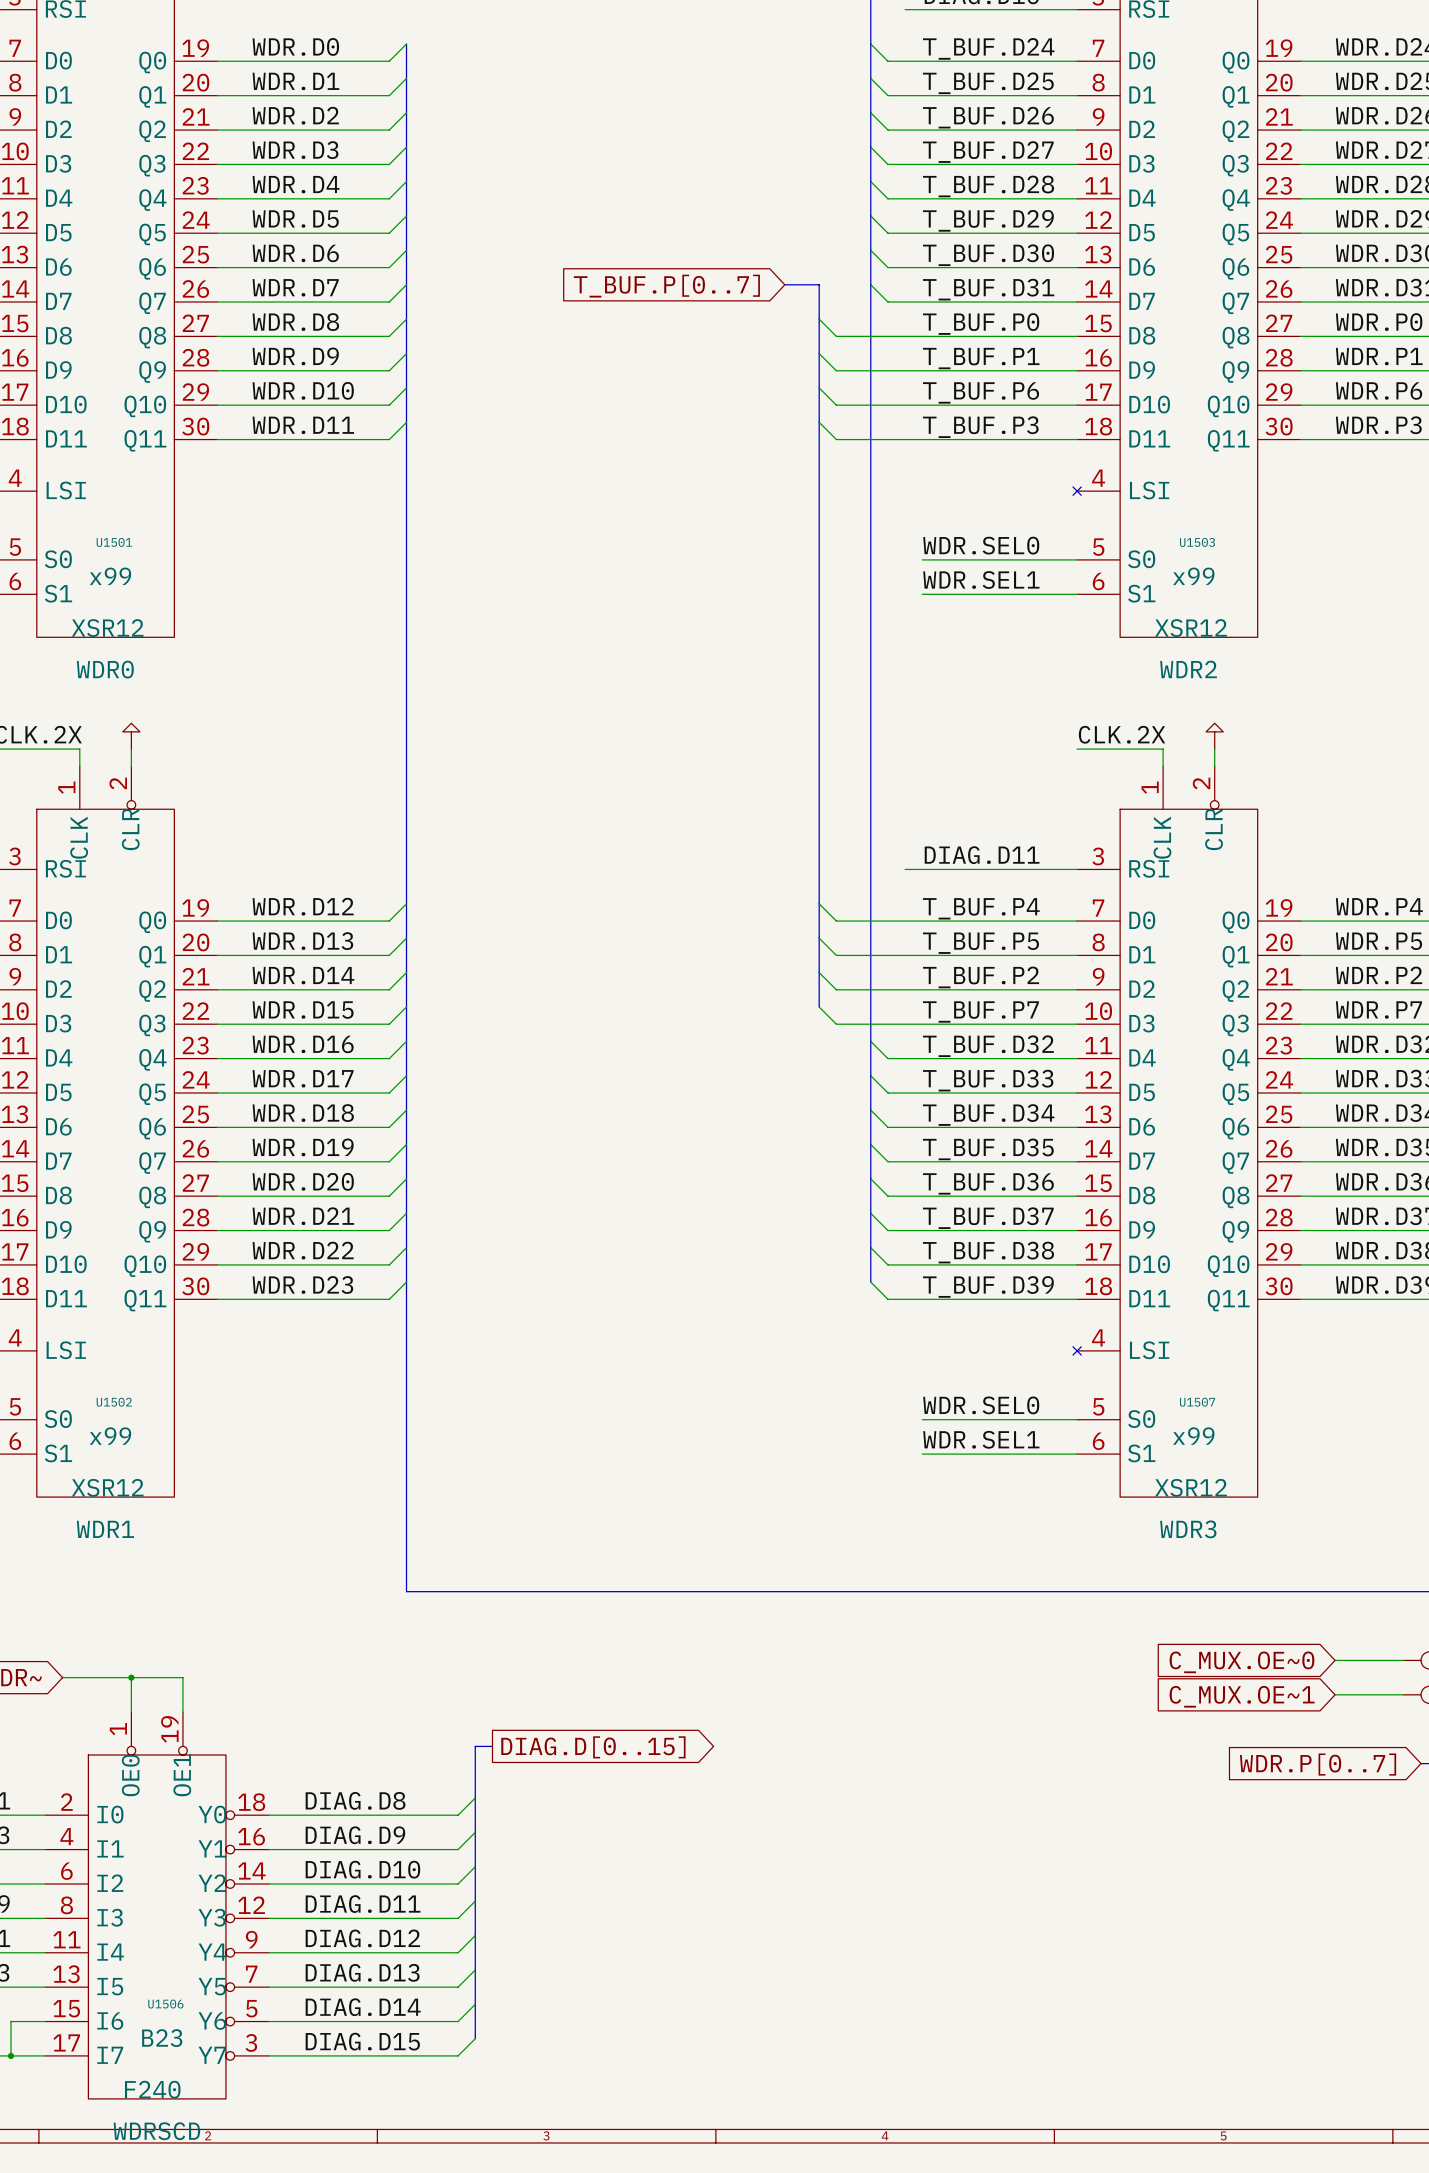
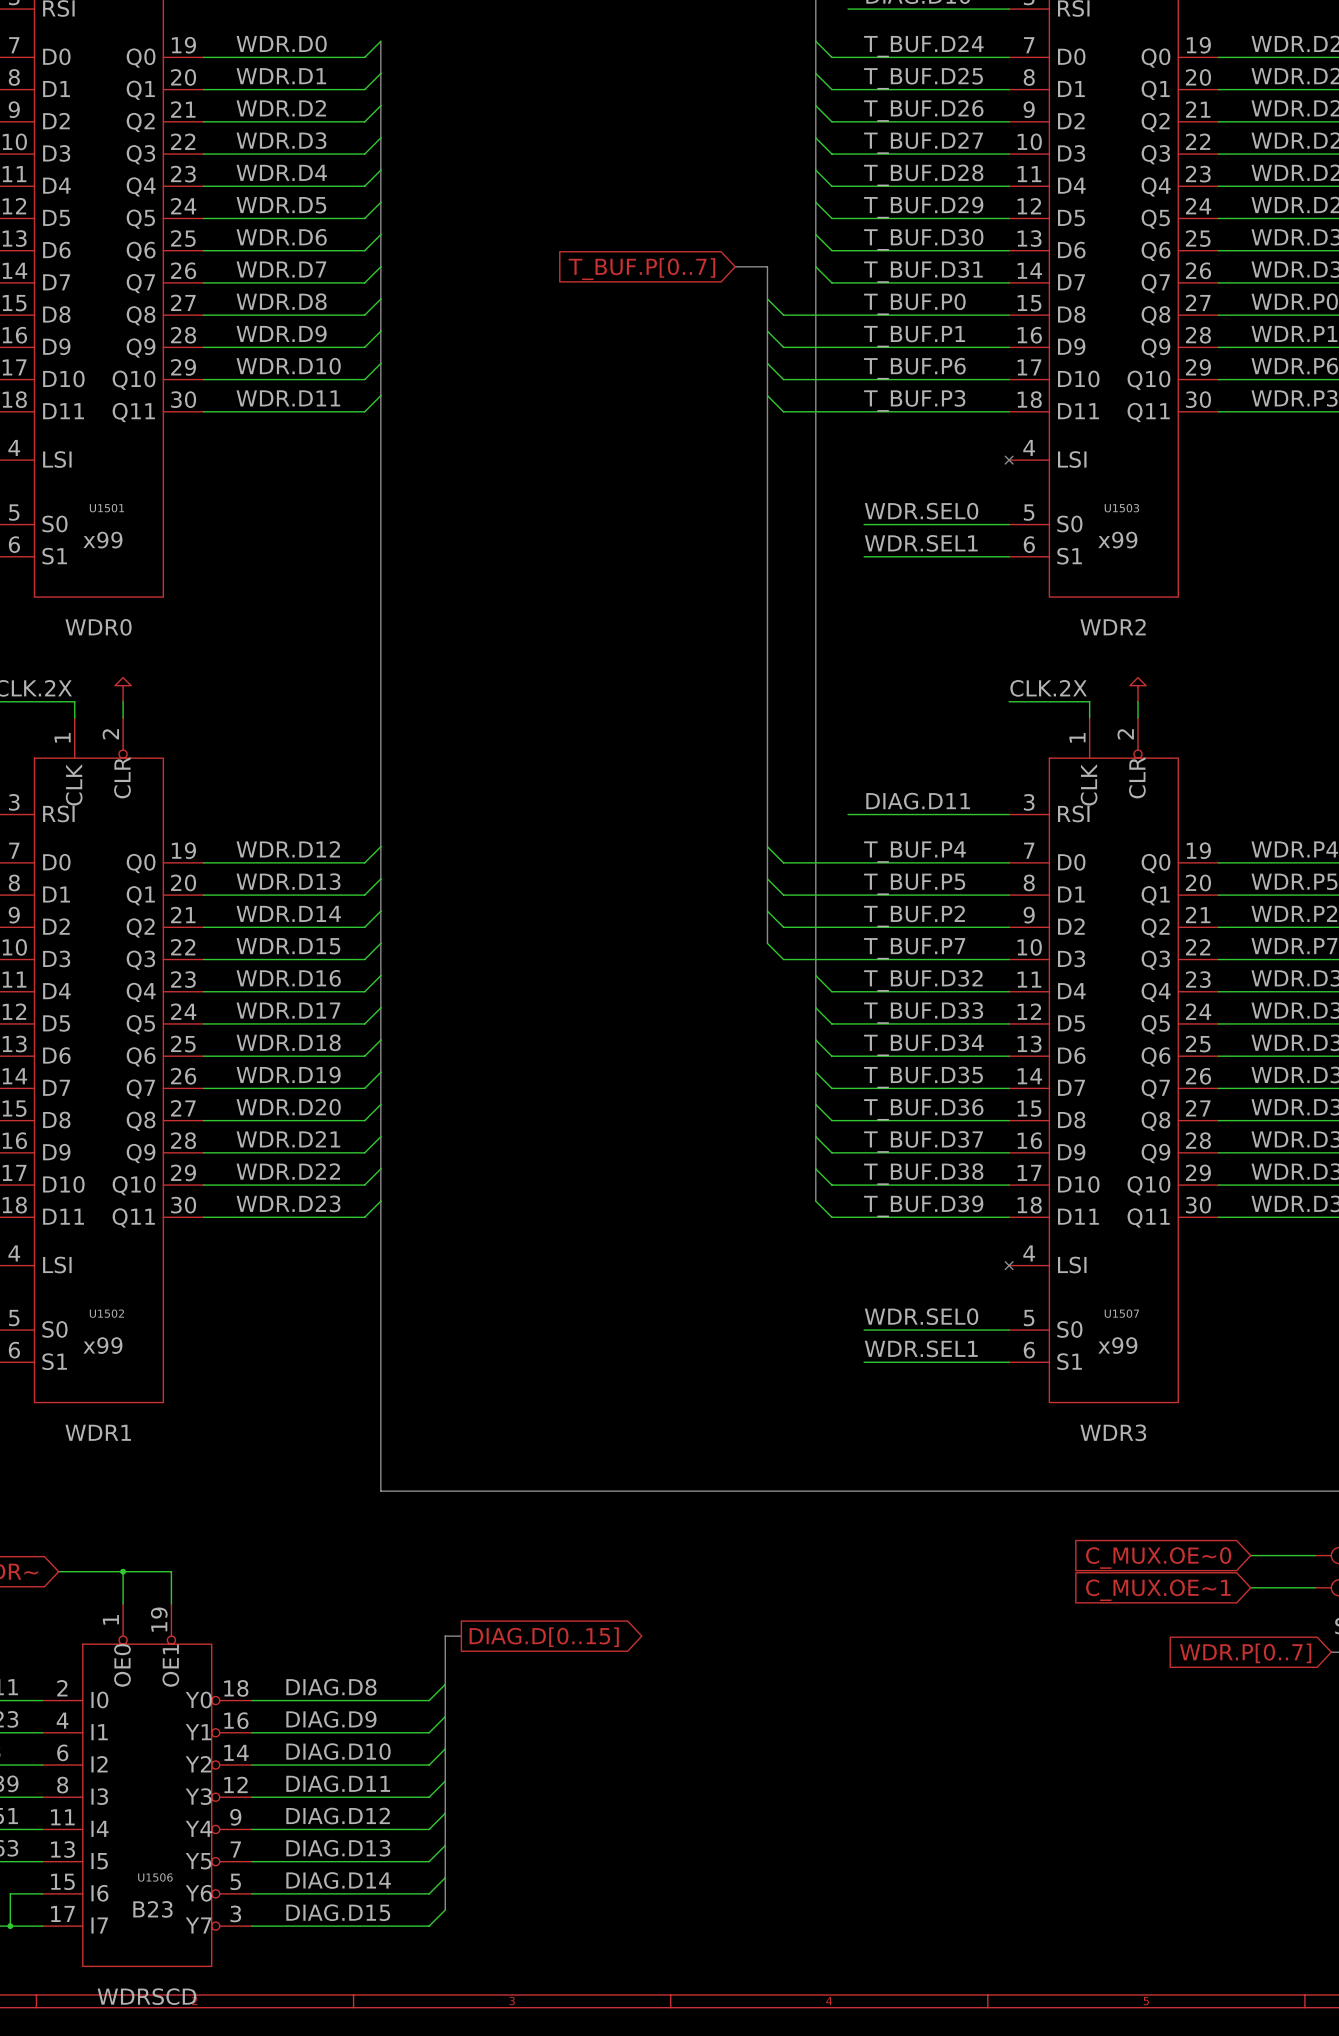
U1501 value: XSR12 (107, 628) -> none
U1503 value: XSR12 (1191, 628) -> none
U1502 value: XSR12 (107, 1487) -> none
U1507 value: XSR12 (1191, 1487) -> none
U1506 value: F240 (152, 2089) -> none

